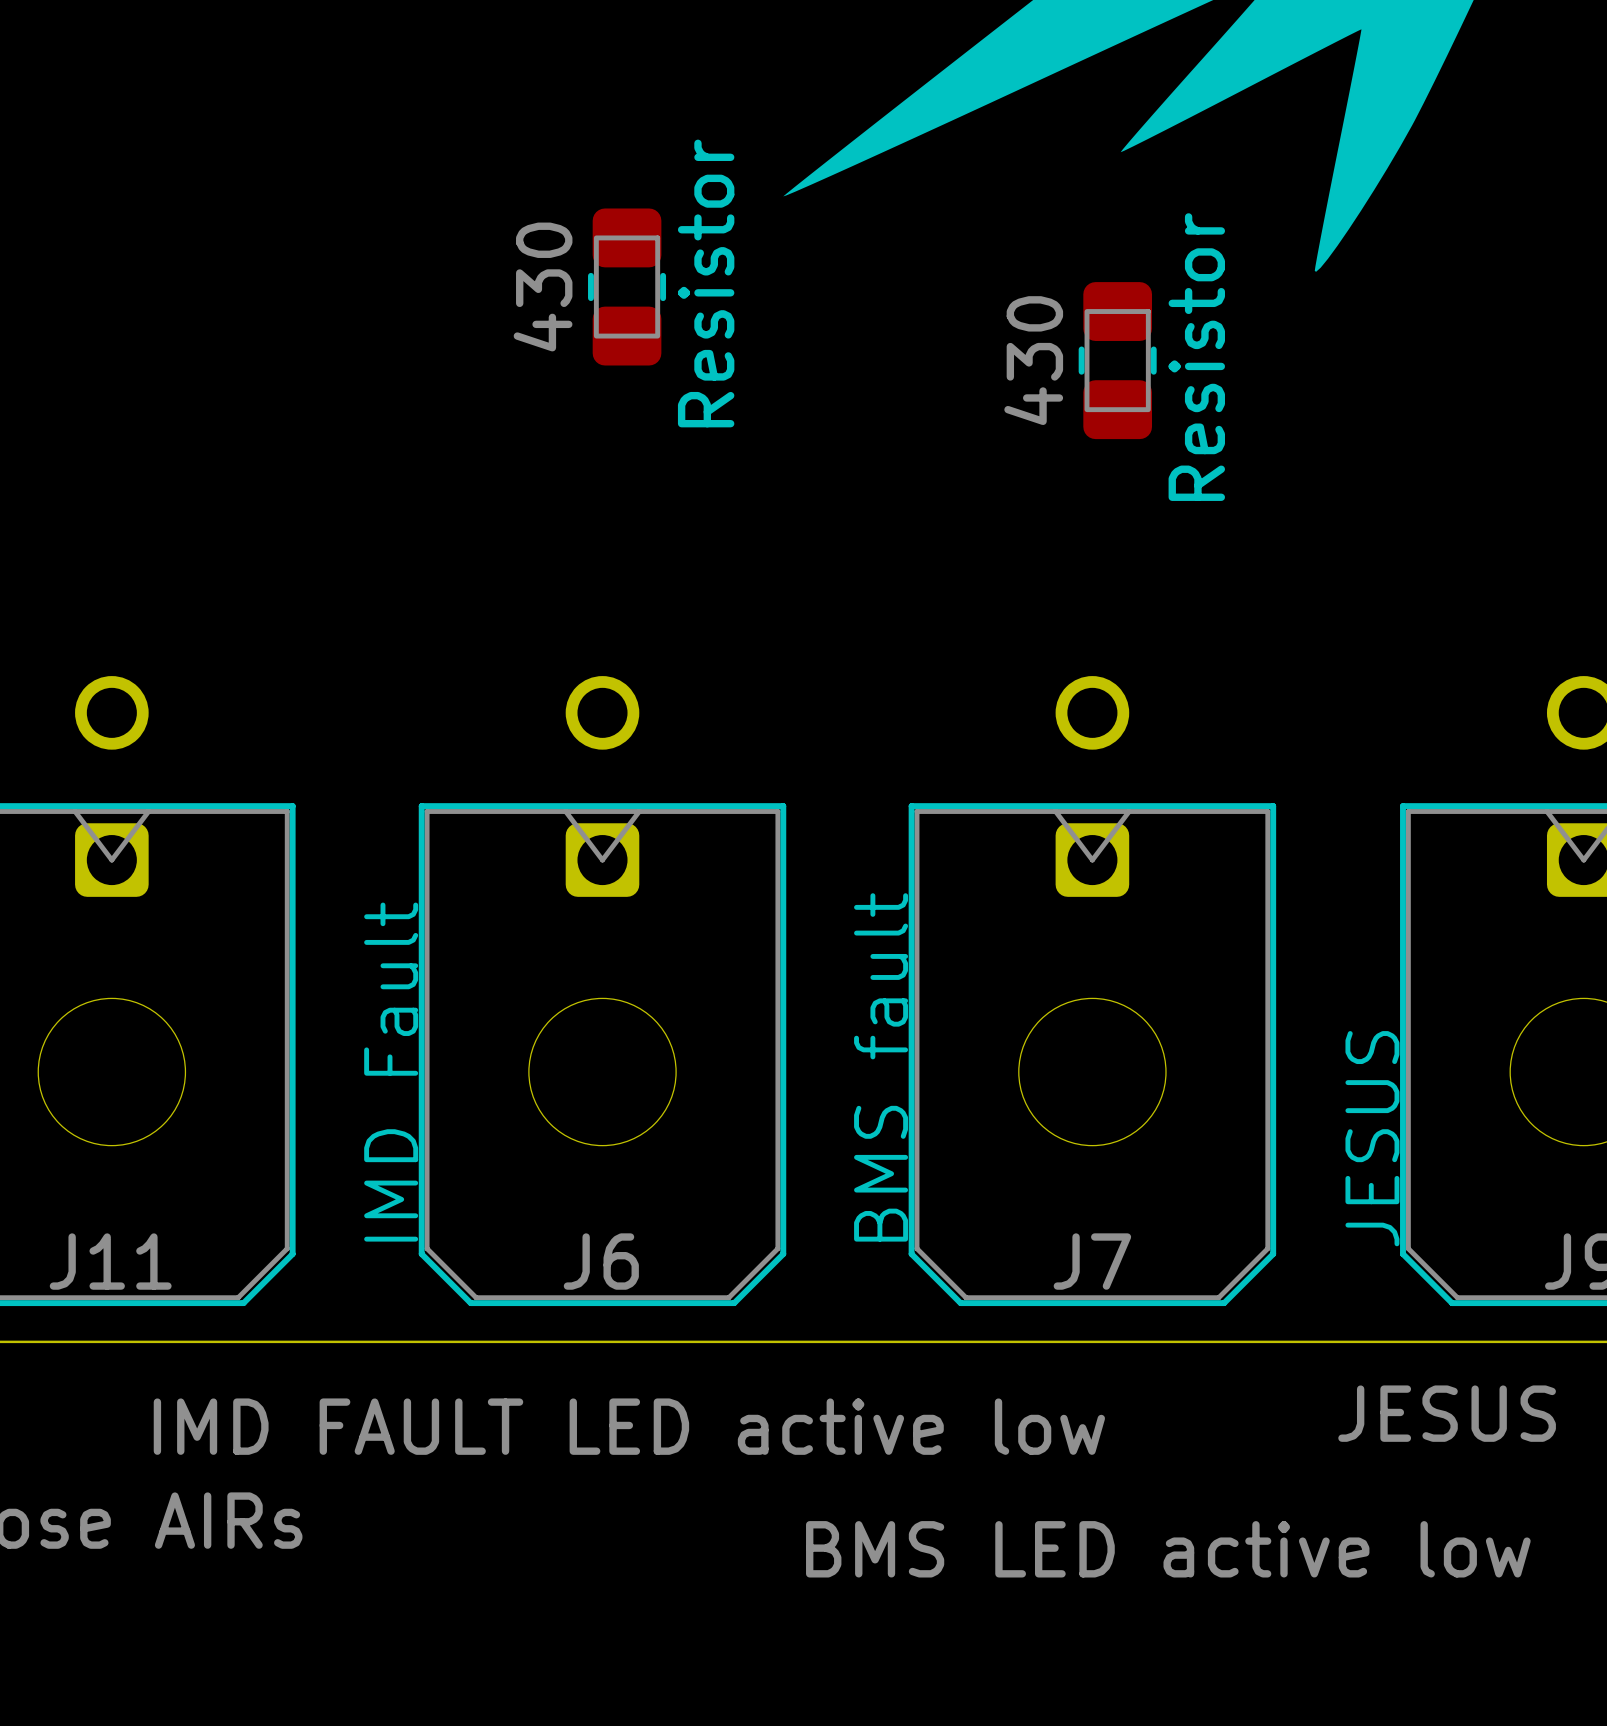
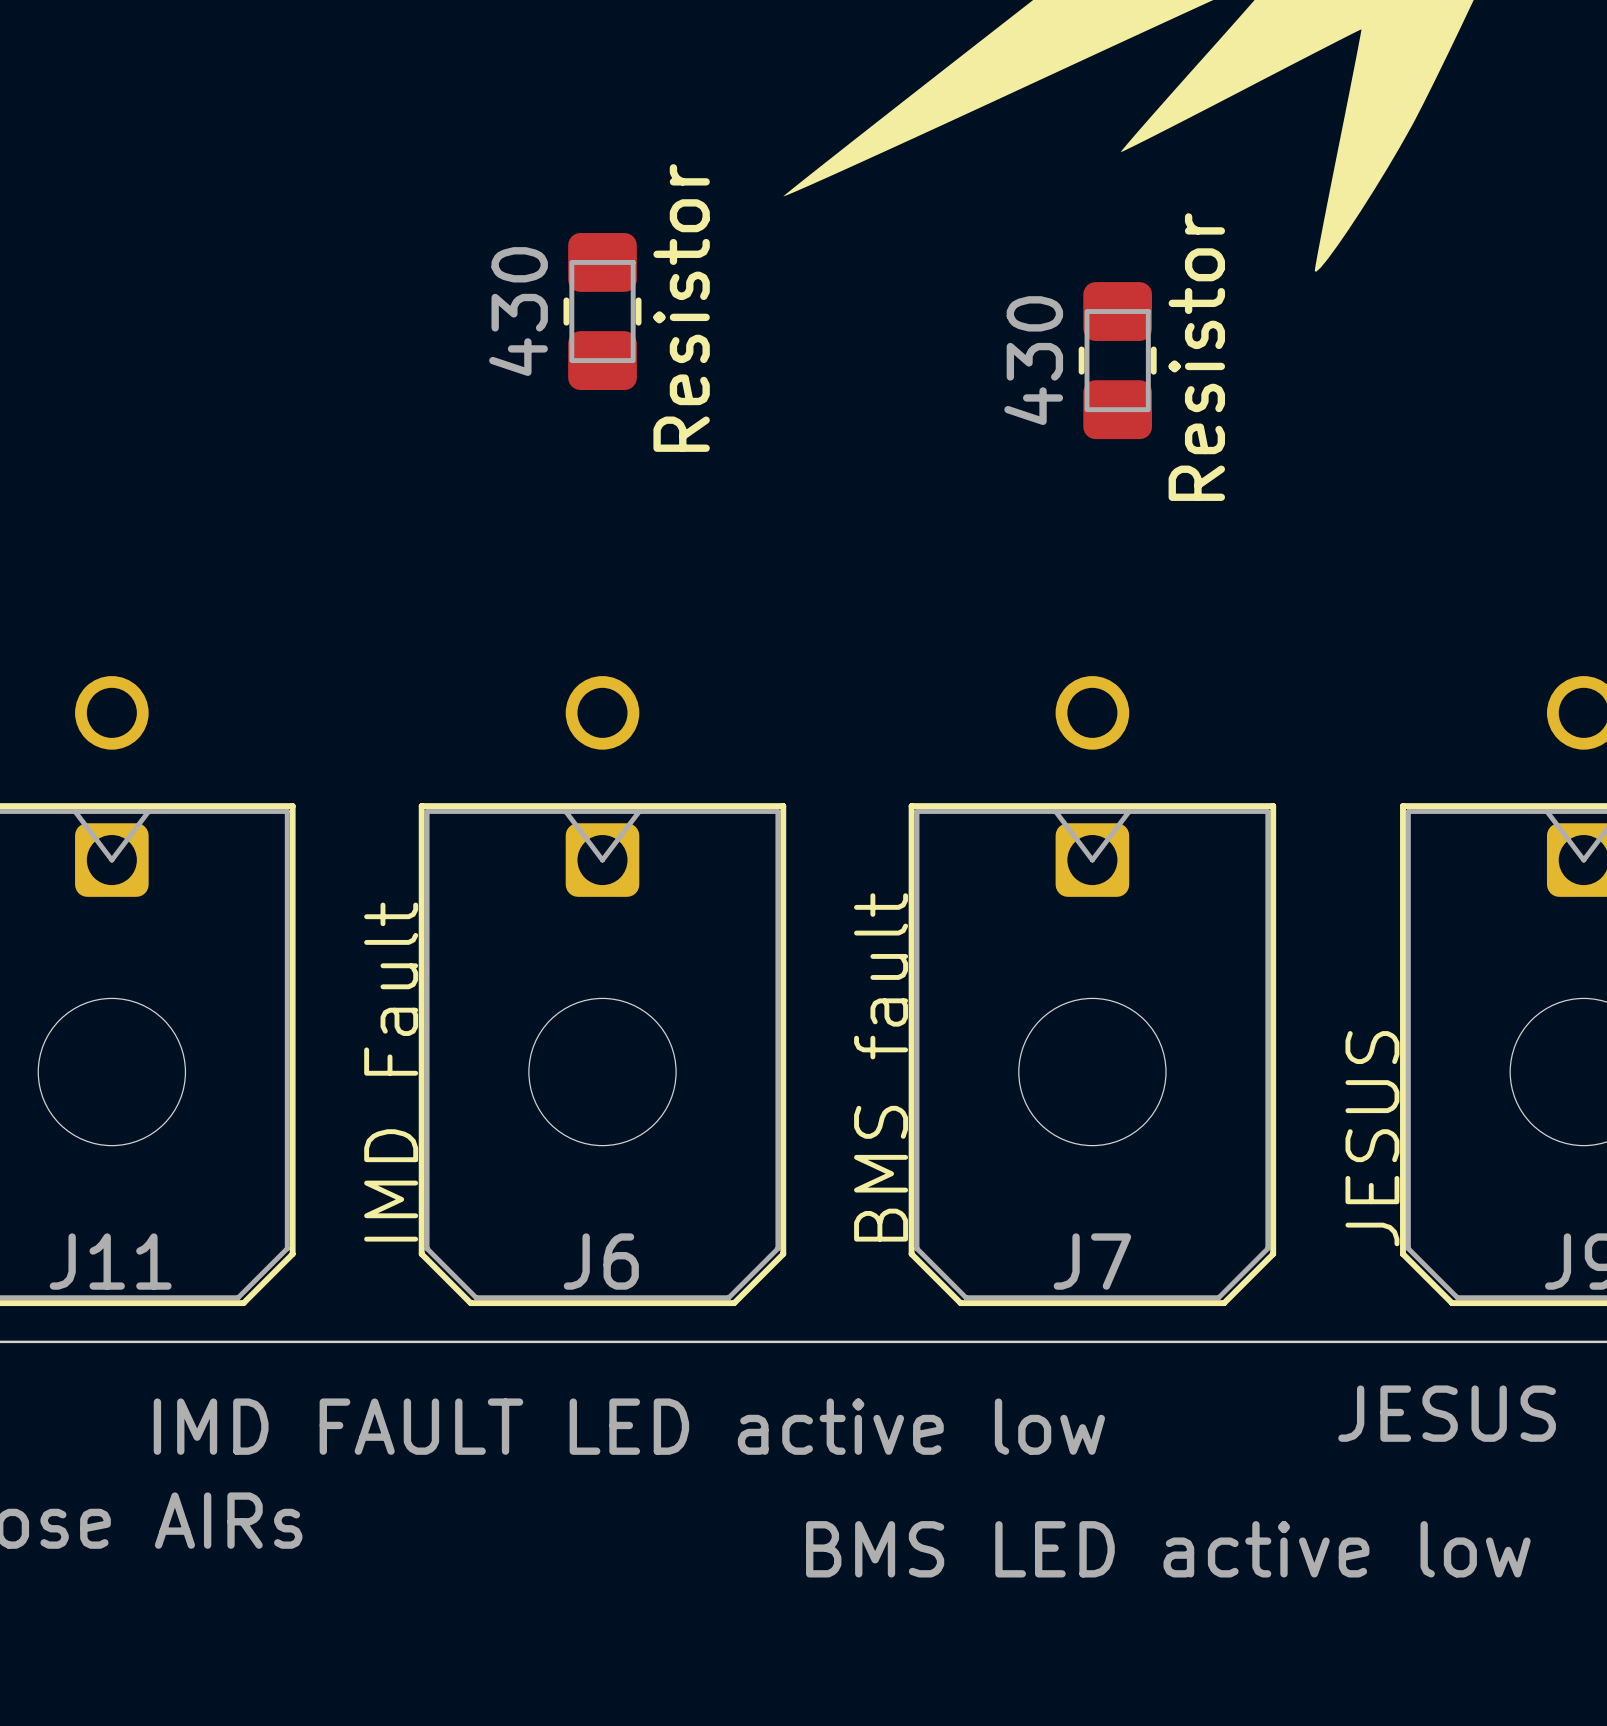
Resistor position: (627, 286) -> (602, 311)

